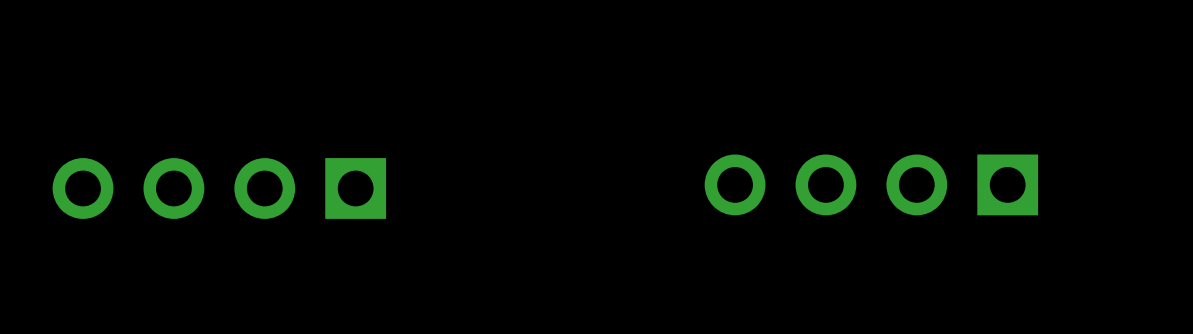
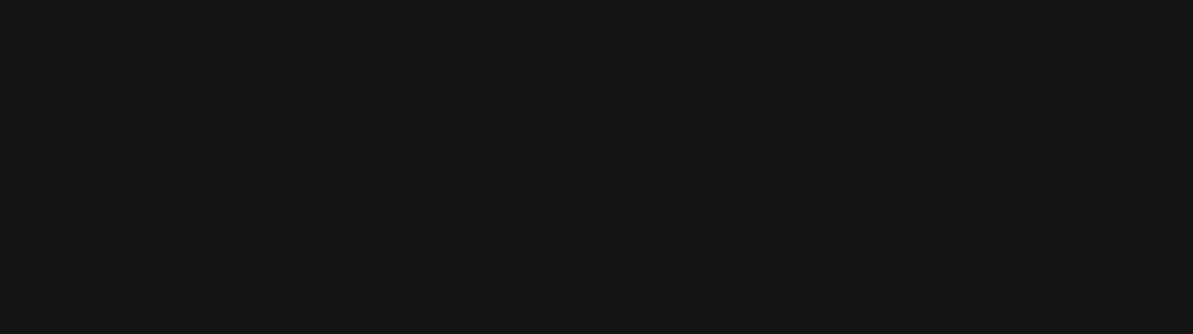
part: (871, 184) -> none
part: (219, 188) -> none

